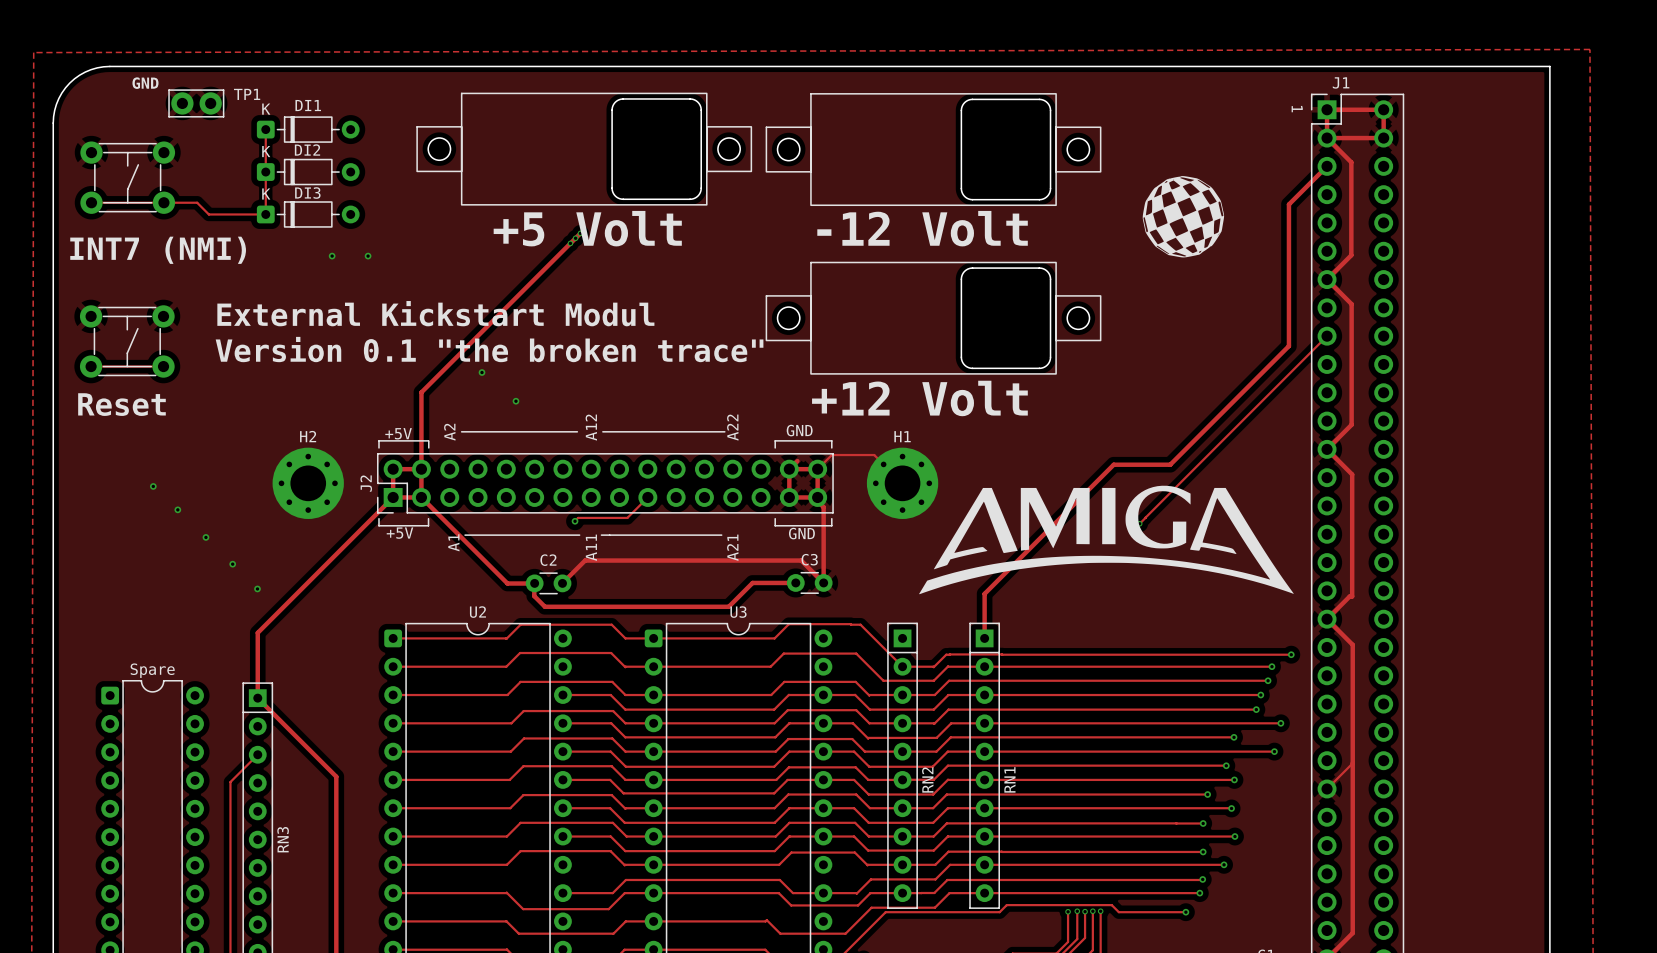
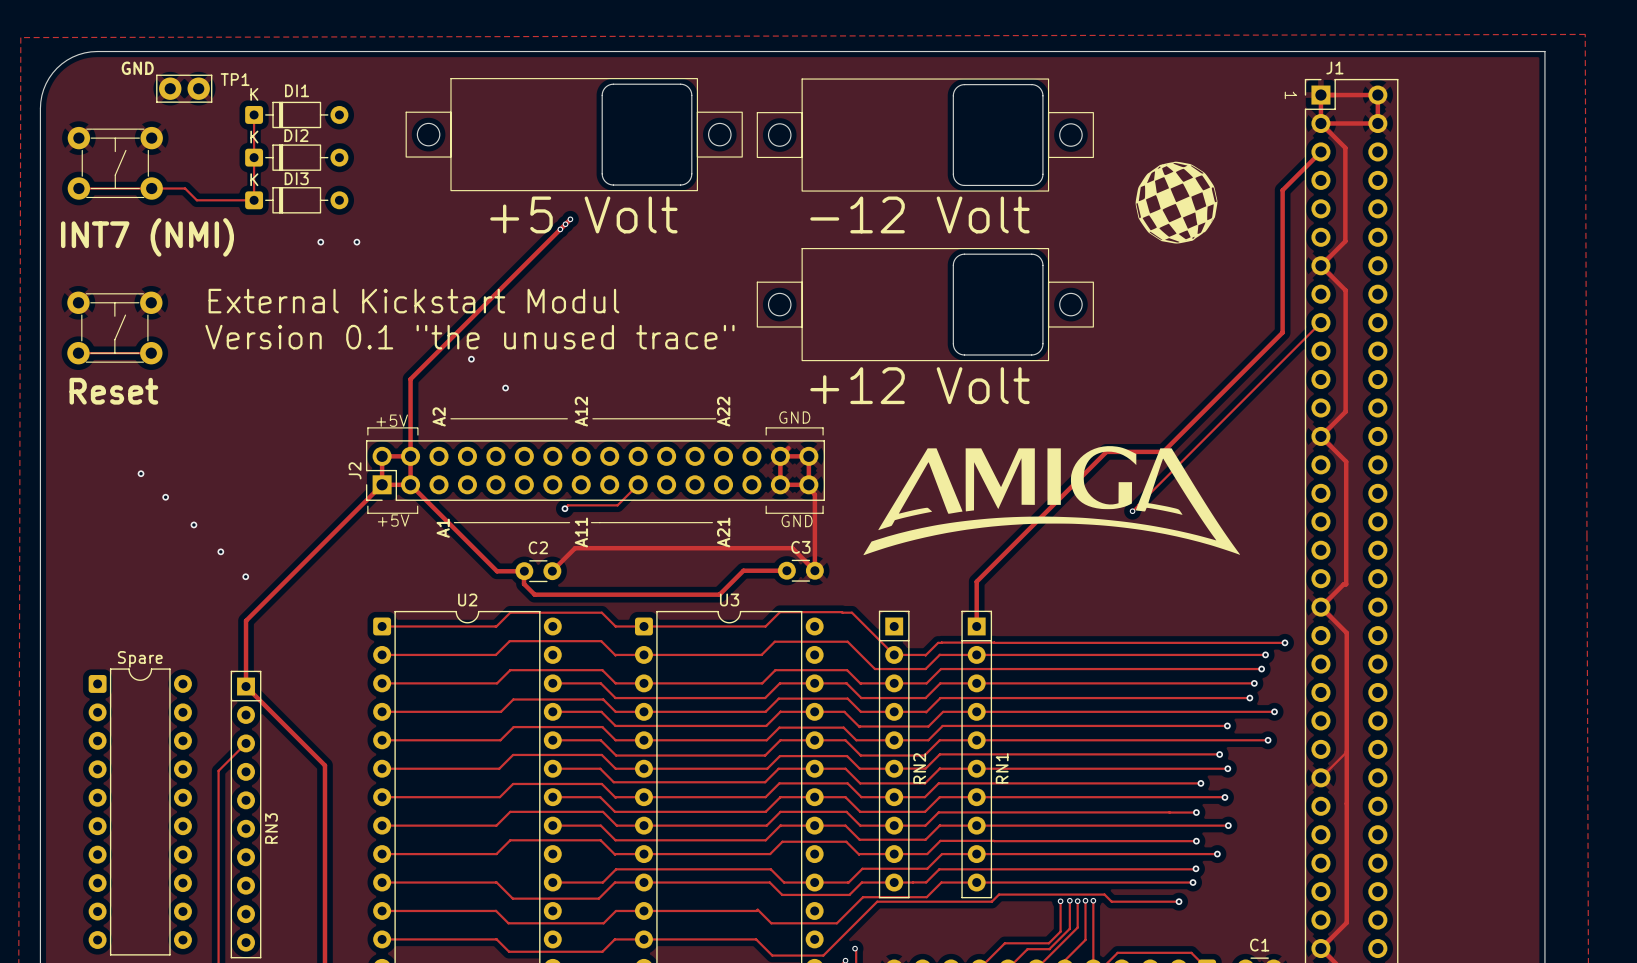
text: Version 0.1 "the broken trace" (489, 349) -> Version 0.1 "the unused trace" (469, 337)
track: (817, 469) (831, 455) (874, 455) (902, 483) -> none
H2: (308, 483) -> none
H1: (902, 483) -> none
drawing position: (1106, 539) -> (1051, 500)

